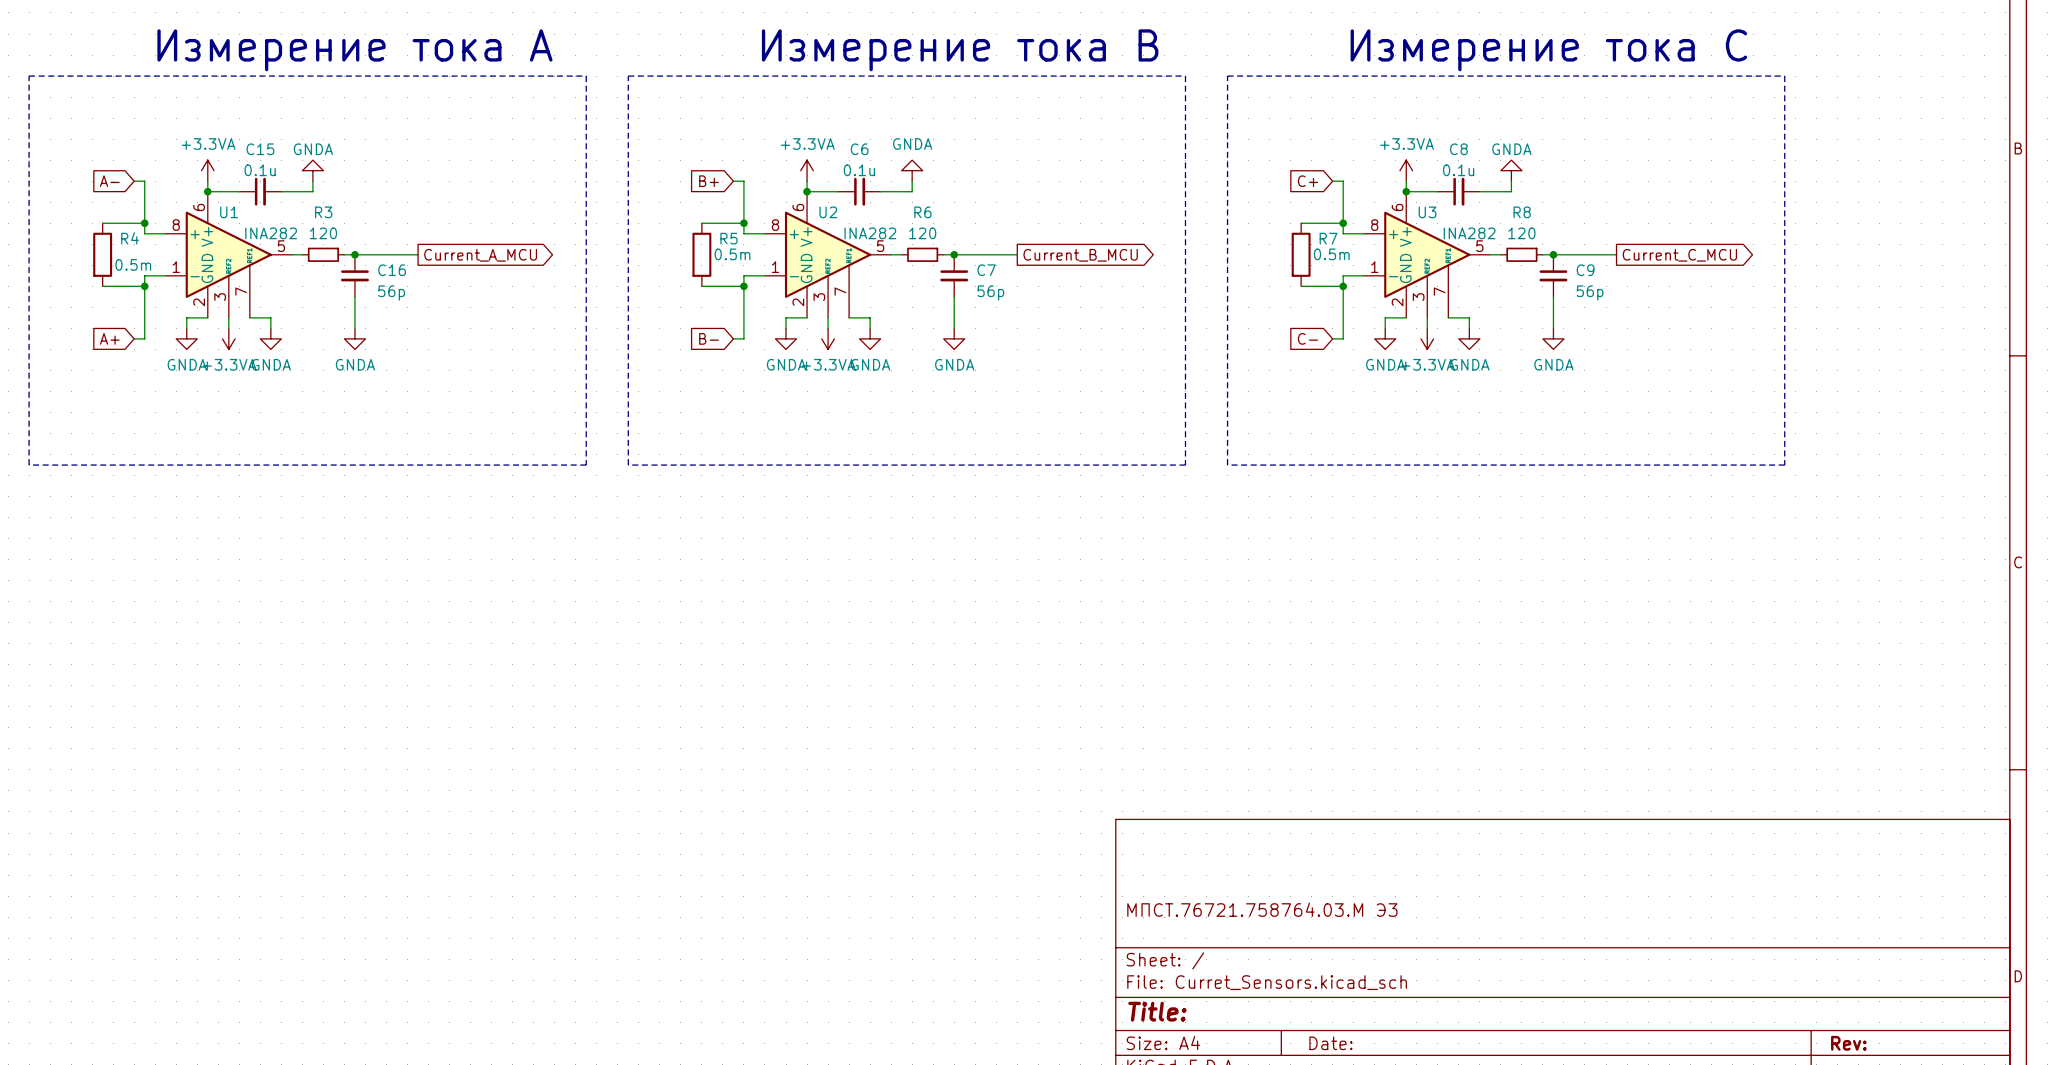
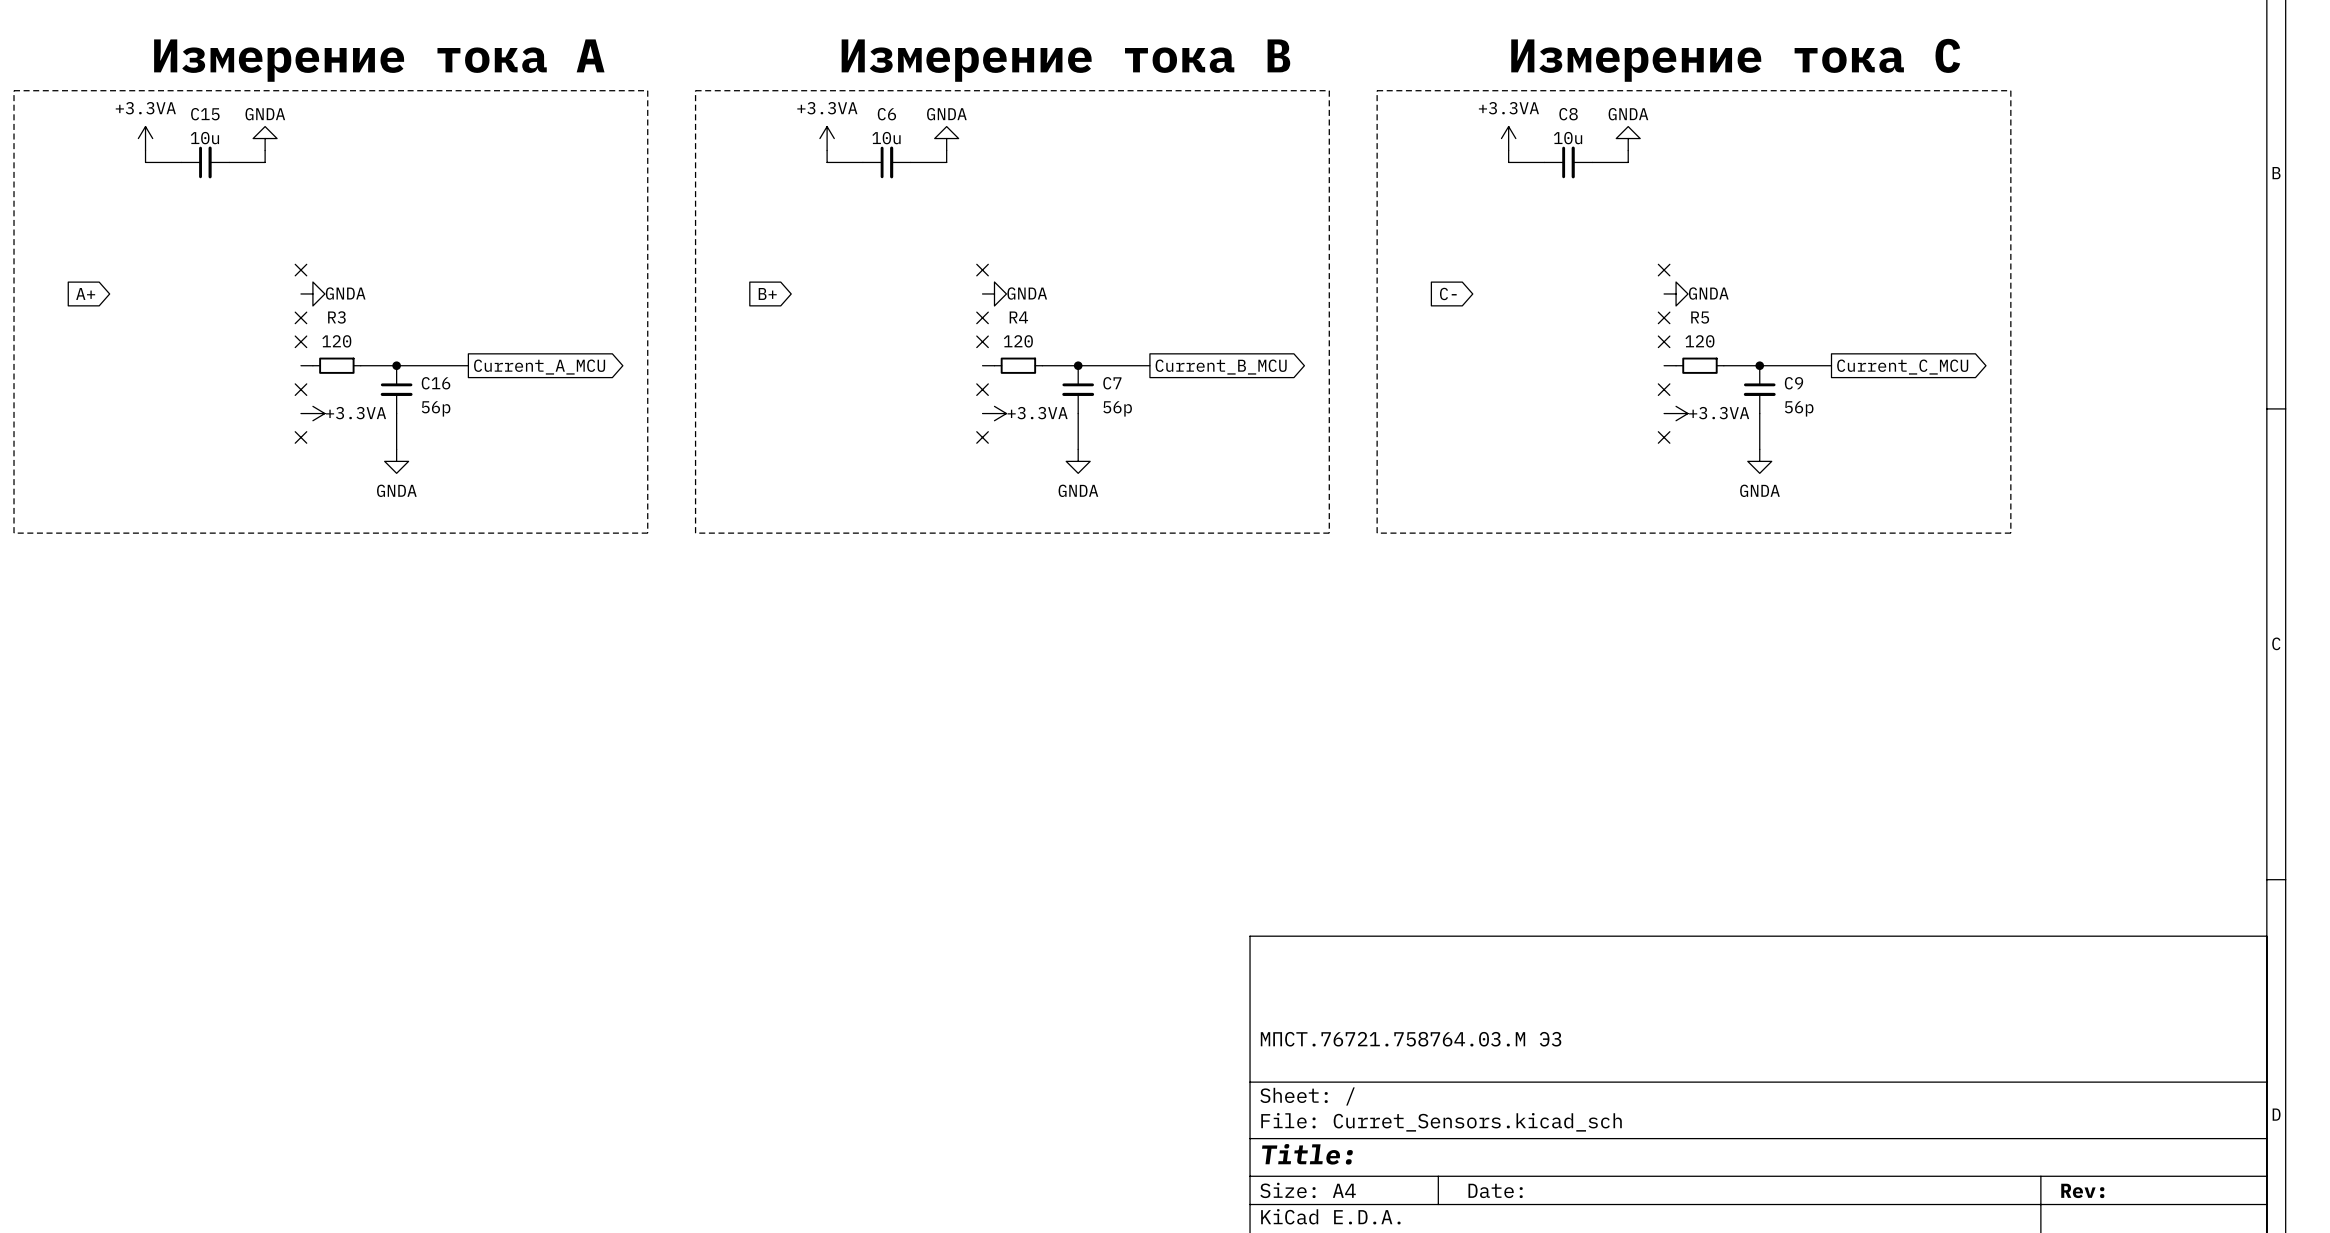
power symbol: none -> GNDA (265, 138)
power symbol: none -> GNDA (946, 138)
power symbol: none -> GNDA (1628, 138)
power symbol position: +3.3VA (207, 170) -> +3.3VA (145, 138)
C15 value: 0.1u (260, 170) -> 10u (204, 138)
power symbol: GNDA (312, 170) -> none
power symbol position: +3.3VA (807, 170) -> +3.3VA (827, 138)
C6 value: 0.1u (859, 170) -> 10u (886, 138)
power symbol: GNDA (912, 170) -> none
power symbol position: +3.3VA (1406, 170) -> +3.3VA (1508, 138)
C8 value: 0.1u (1458, 170) -> 10u (1568, 138)
power symbol: GNDA (1511, 170) -> none
global label: A- (109, 181) -> none
wire: (134, 181) (144, 181) (144, 233) (165, 233) -> none
wire: (207, 181) (207, 191) (239, 191) -> (145, 150) (145, 162) (181, 162)
wire: (312, 181) (312, 191) (281, 191) -> (265, 150) (265, 162) (229, 162)
global label position: B+ (709, 181) -> B+ (767, 293)
wire: (733, 181) (743, 181) (743, 233) (764, 233) -> none
wire: (807, 181) (807, 191) (838, 191) -> (827, 150) (827, 162) (862, 162)
wire: (912, 181) (912, 191) (880, 191) -> (946, 150) (946, 162) (910, 162)
global label: C+ (1308, 181) -> none
wire: (1332, 181) (1343, 181) (1343, 233) (1364, 233) -> none
wire: (1406, 181) (1406, 191) (1437, 191) -> (1508, 150) (1508, 162) (1544, 162)
wire: (1511, 181) (1511, 191) (1479, 191) -> (1628, 150) (1628, 162) (1592, 162)
junction: (207, 191) -> none
C15 position: (260, 191) -> (205, 162)
junction: (807, 191) -> none
C6 position: (859, 191) -> (886, 162)
junction: (1406, 191) -> none
C8 position: (1458, 191) -> (1568, 162)
R4 symbol: [93, 223, 113, 287] -> [994, 357, 1043, 374]
wire: (102, 223) (144, 223) -> none
junction: (144, 223) -> none
R5 symbol: [692, 223, 712, 287] -> [1676, 357, 1724, 374]
wire: (701, 223) (743, 223) -> none
junction: (743, 223) -> none
wire: (1301, 223) (1343, 223) -> none
junction: (1343, 223) -> none
no-connect mark: none -> (300, 270)
no-connect mark: none -> (982, 270)
no-connect mark: none -> (1664, 270)
R4 name position: R4 (130, 238) -> R4 (1018, 317)
R5 name position: R5 (729, 238) -> R5 (1700, 317)
U1: INA282 (228, 254) -> none
wire: (291, 254) (302, 254) -> (300, 365) (312, 365)
power symbol: none -> GNDA (312, 293)
R3 position: (323, 254) -> (336, 365)
wire: (344, 254) (418, 254) -> none
junction: (354, 254) -> none
R5 value: 0.5m (732, 254) -> 120 (1699, 341)
U2: INA282 (828, 254) -> none
wire: (891, 254) (901, 254) -> (982, 365) (994, 365)
power symbol: none -> GNDA (994, 293)
R6: 120 (922, 254) -> none
wire: (943, 254) (1017, 254) -> none
junction: (954, 254) -> none
R7: 0.5m (1301, 254) -> none
U3: INA282 (1427, 254) -> none
wire: (1490, 254) (1500, 254) -> (1664, 365) (1676, 365)
power symbol: none -> GNDA (1676, 293)
R8: 120 (1521, 254) -> none
wire: (1542, 254) (1616, 254) -> none
junction: (1553, 254) -> none
global label position: Current_A_MCU (480, 255) -> Current_A_MCU (539, 367)
global label position: Current_B_MCU (1080, 255) -> Current_B_MCU (1221, 367)
global label position: Current_C_MCU (1679, 255) -> Current_C_MCU (1902, 367)
R4 value: 0.5m (133, 264) -> 120 (1018, 341)
wire: (165, 275) (144, 275) (144, 338) (134, 338) -> none
no-connect mark: none -> (300, 317)
C16 position: (354, 275) -> (396, 389)
wire: (764, 275) (743, 275) (743, 338) (733, 338) -> none
no-connect mark: none -> (982, 317)
C7 position: (954, 275) -> (1078, 389)
wire: (1364, 275) (1343, 275) (1343, 338) (1332, 338) -> none
no-connect mark: none -> (1664, 317)
C9 position: (1553, 275) -> (1759, 389)
wire: (102, 286) (144, 286) -> none
junction: (144, 286) -> none
wire: (701, 286) (743, 286) -> none
junction: (743, 286) -> none
wire: (1301, 286) (1343, 286) -> none
junction: (1343, 286) -> none
no-connect mark: none -> (300, 341)
wire: (354, 296) (354, 328) -> (396, 413) (396, 449)
no-connect mark: none -> (982, 341)
wire: (954, 296) (954, 328) -> (1078, 413) (1078, 449)
no-connect mark: none -> (1664, 341)
wire: (1553, 296) (1553, 328) -> (1759, 413) (1759, 449)
wire: (207, 317) (186, 317) (186, 328) -> none
wire: (228, 317) (228, 328) -> none
wire: (249, 317) (270, 317) (270, 328) -> none
wire: none -> (360, 365) (468, 365)
junction: none -> (396, 365)
wire: (807, 317) (786, 317) (786, 328) -> none
wire: (828, 317) (828, 328) -> none
wire: (849, 317) (870, 317) (870, 328) -> none
wire: none -> (1042, 365) (1149, 365)
junction: none -> (1078, 365)
wire: (1406, 317) (1385, 317) (1385, 328) -> none
wire: (1427, 317) (1427, 328) -> none
wire: (1448, 317) (1469, 317) (1469, 328) -> none
wire: none -> (1723, 365) (1831, 365)
junction: none -> (1759, 365)
global label position: A+ (109, 338) -> A+ (85, 293)
power symbol: GNDA (186, 338) -> none
power symbol rotation: 0° (228, 338) -> 90° counterclockwise (312, 413)
power symbol position: +3.3VA (228, 338) -> +3.3VA (312, 413)
power symbol: GNDA (270, 338) -> none
no-connect mark: none -> (300, 389)
power symbol: GNDA (354, 338) -> none
global label: B- (709, 338) -> none
power symbol: GNDA (786, 338) -> none
power symbol rotation: 0° (828, 338) -> 90° counterclockwise (994, 413)
power symbol position: +3.3VA (828, 338) -> +3.3VA (994, 413)
power symbol: GNDA (870, 338) -> none
no-connect mark: none -> (982, 389)
power symbol: GNDA (954, 338) -> none
global label position: C- (1308, 338) -> C- (1448, 293)
power symbol: GNDA (1385, 338) -> none
power symbol rotation: 0° (1427, 338) -> 90° counterclockwise (1676, 413)
power symbol position: +3.3VA (1427, 338) -> +3.3VA (1676, 413)
power symbol: GNDA (1469, 338) -> none
no-connect mark: none -> (1664, 389)
power symbol: GNDA (1553, 338) -> none
power symbol text position: +3.3VA (229, 364) -> +3.3VA (356, 413)
power symbol text position: +3.3VA (828, 364) -> +3.3VA (1037, 413)
power symbol text position: +3.3VA (1428, 364) -> +3.3VA (1719, 413)
no-connect mark: none -> (300, 437)
no-connect mark: none -> (982, 437)
no-connect mark: none -> (1664, 437)
power symbol: none -> GNDA (396, 461)
power symbol: none -> GNDA (1078, 461)
power symbol: none -> GNDA (1759, 461)

